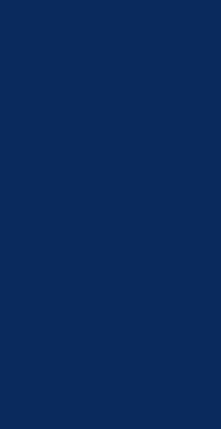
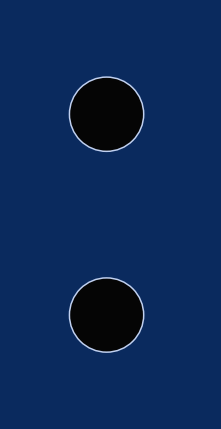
part: none -> (106, 114)
part: none -> (106, 315)

